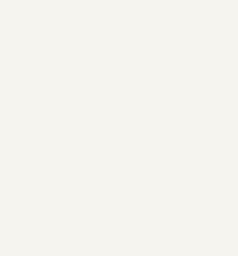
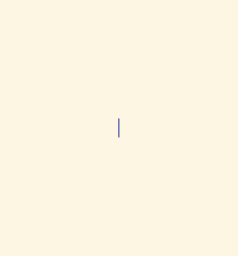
line: none -> (118, 118) (118, 137)

